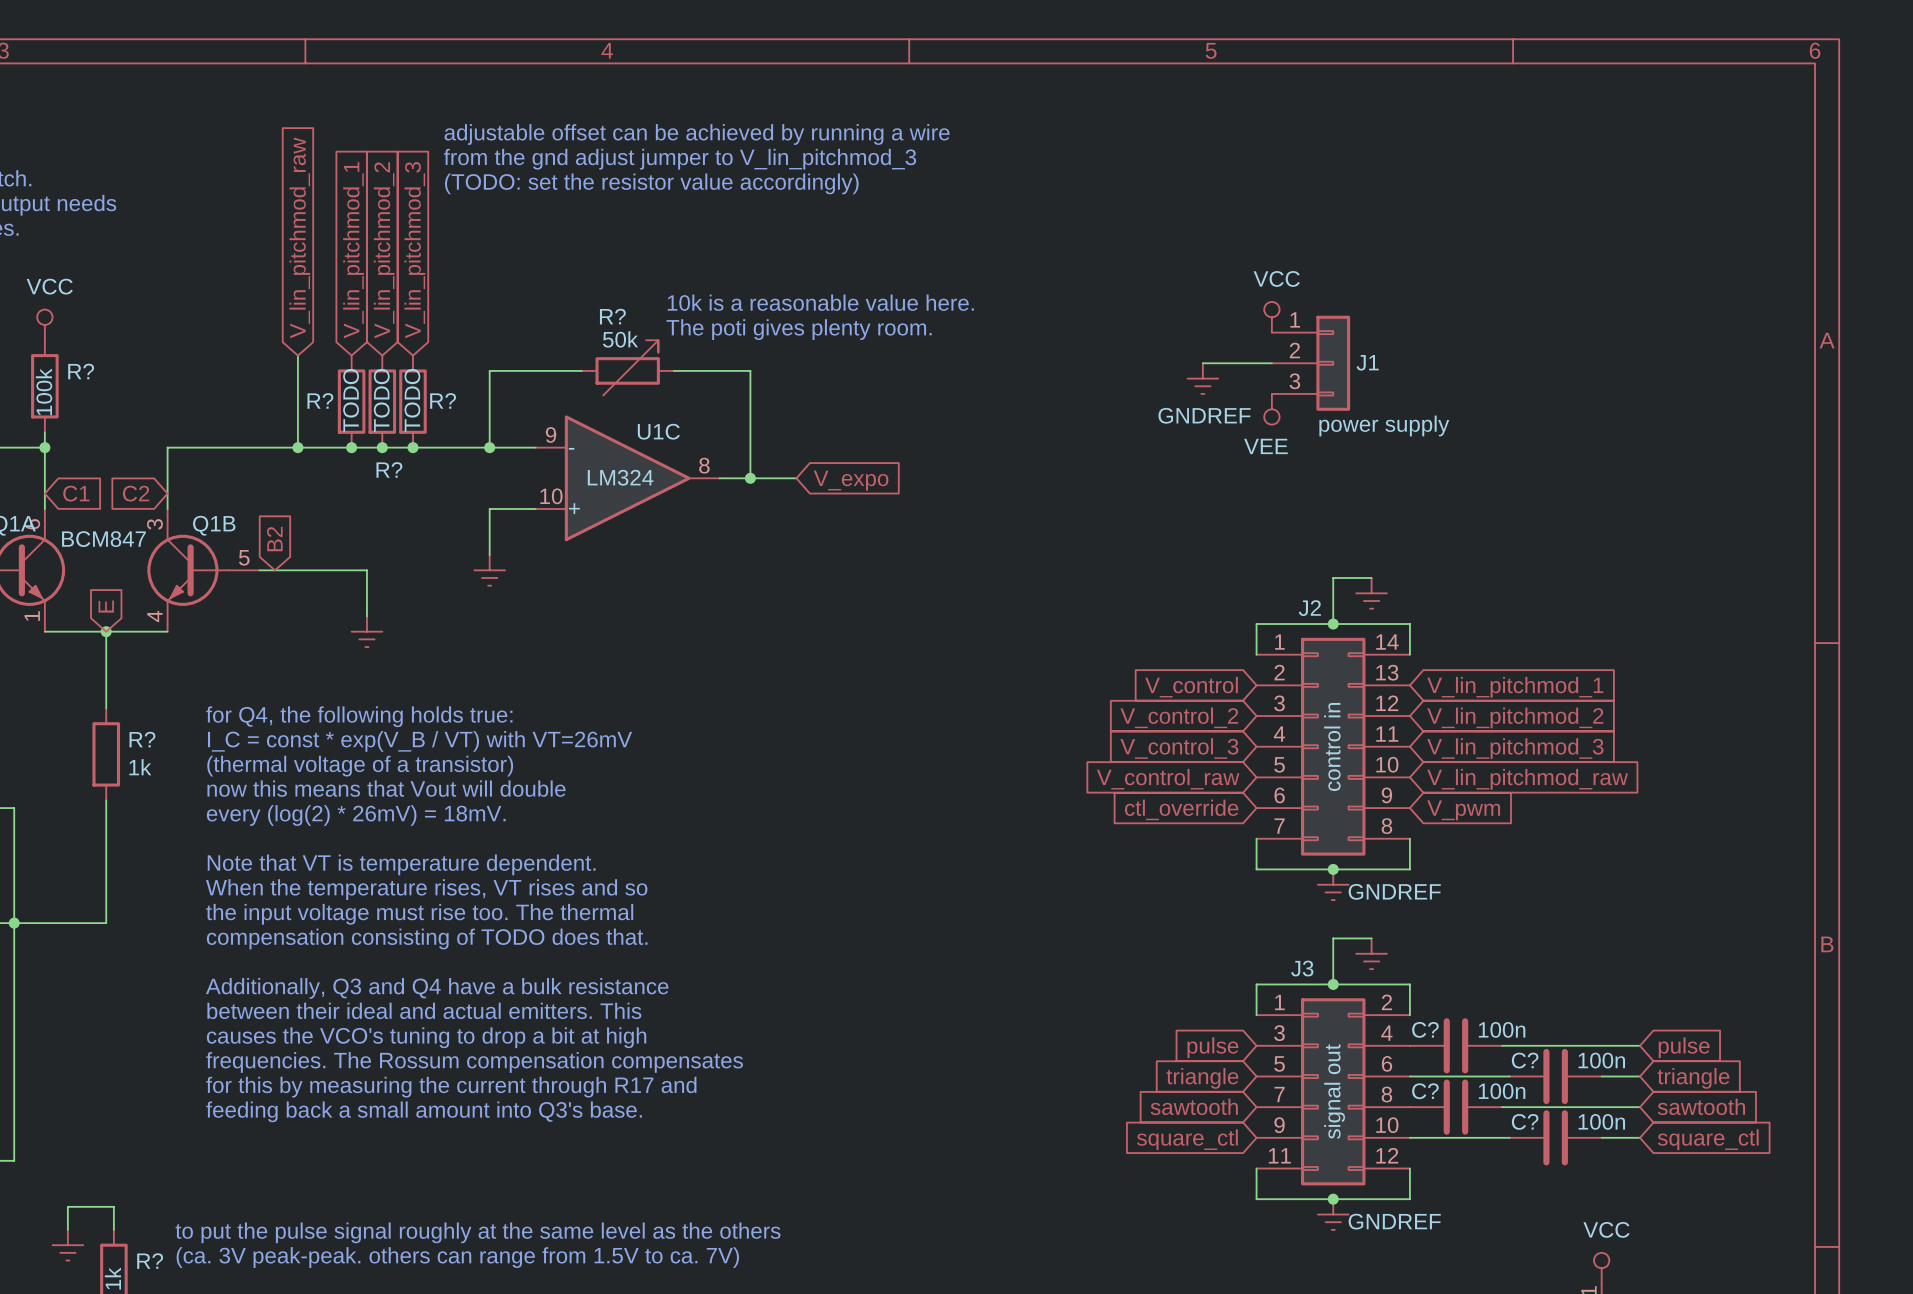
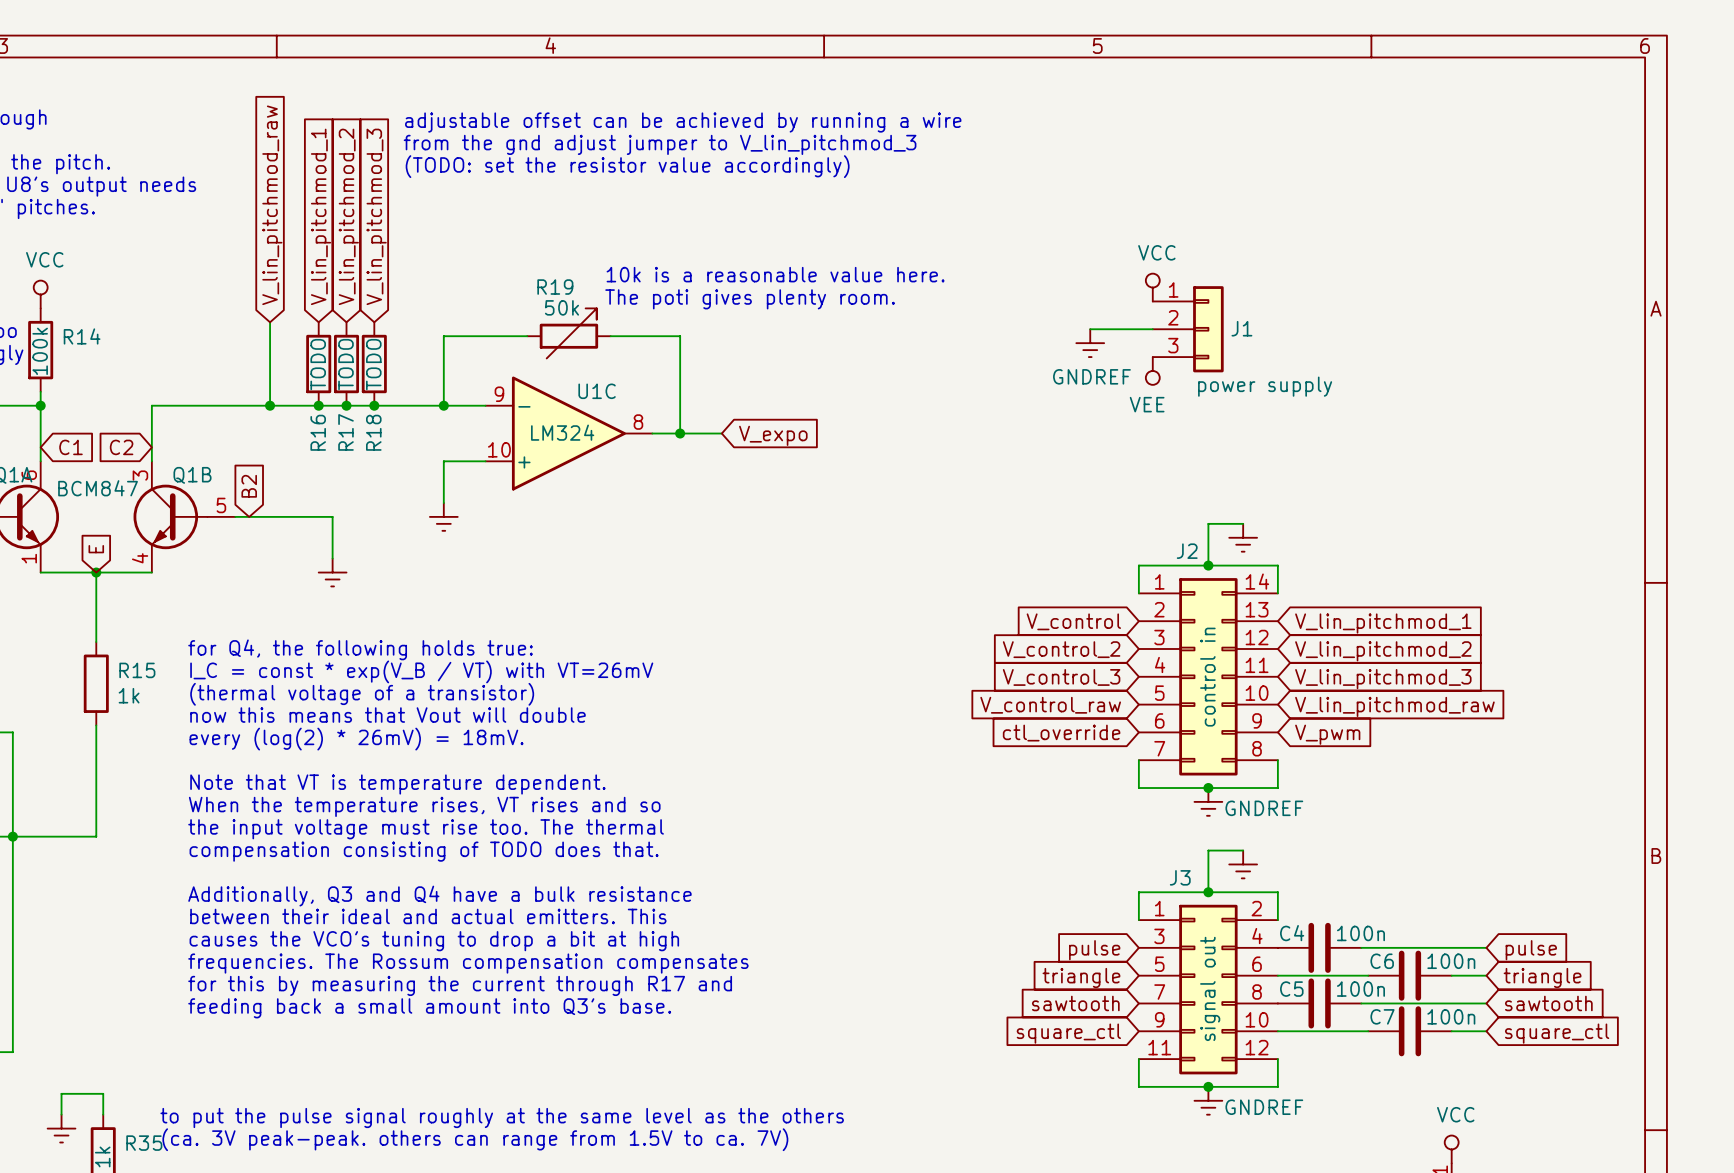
R? name: R? (612, 316) -> R19 (555, 287)
R? name: R? (81, 371) -> R14 (82, 336)
R? name: R? (320, 400) -> R16 (318, 432)
R? name: R? (443, 400) -> R18 (373, 432)
R? name: R? (389, 469) -> R17 (345, 432)
R? name: R? (142, 739) -> R15 (137, 670)
C? name: C? (1425, 1029) -> C4 (1292, 933)
C? name: C? (1525, 1060) -> C6 (1382, 961)
C? name: C? (1425, 1091) -> C5 (1291, 989)
C? name: C? (1525, 1121) -> C7 (1382, 1016)
R? name: R? (150, 1261) -> R35 (144, 1143)

